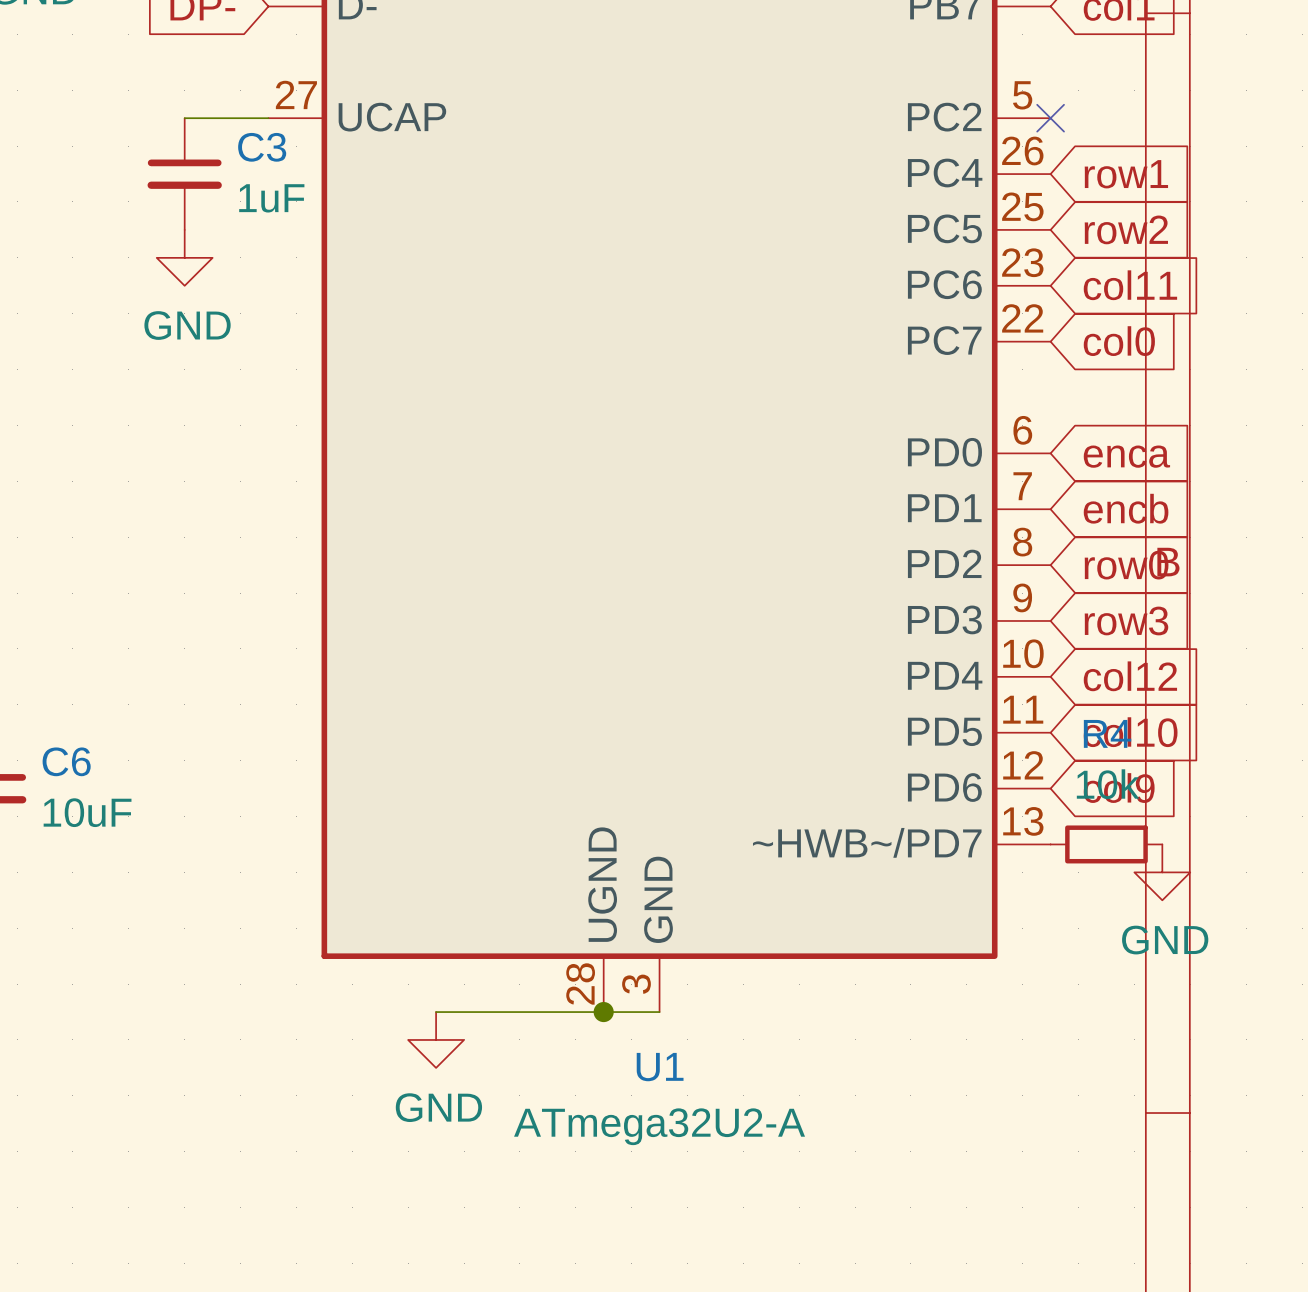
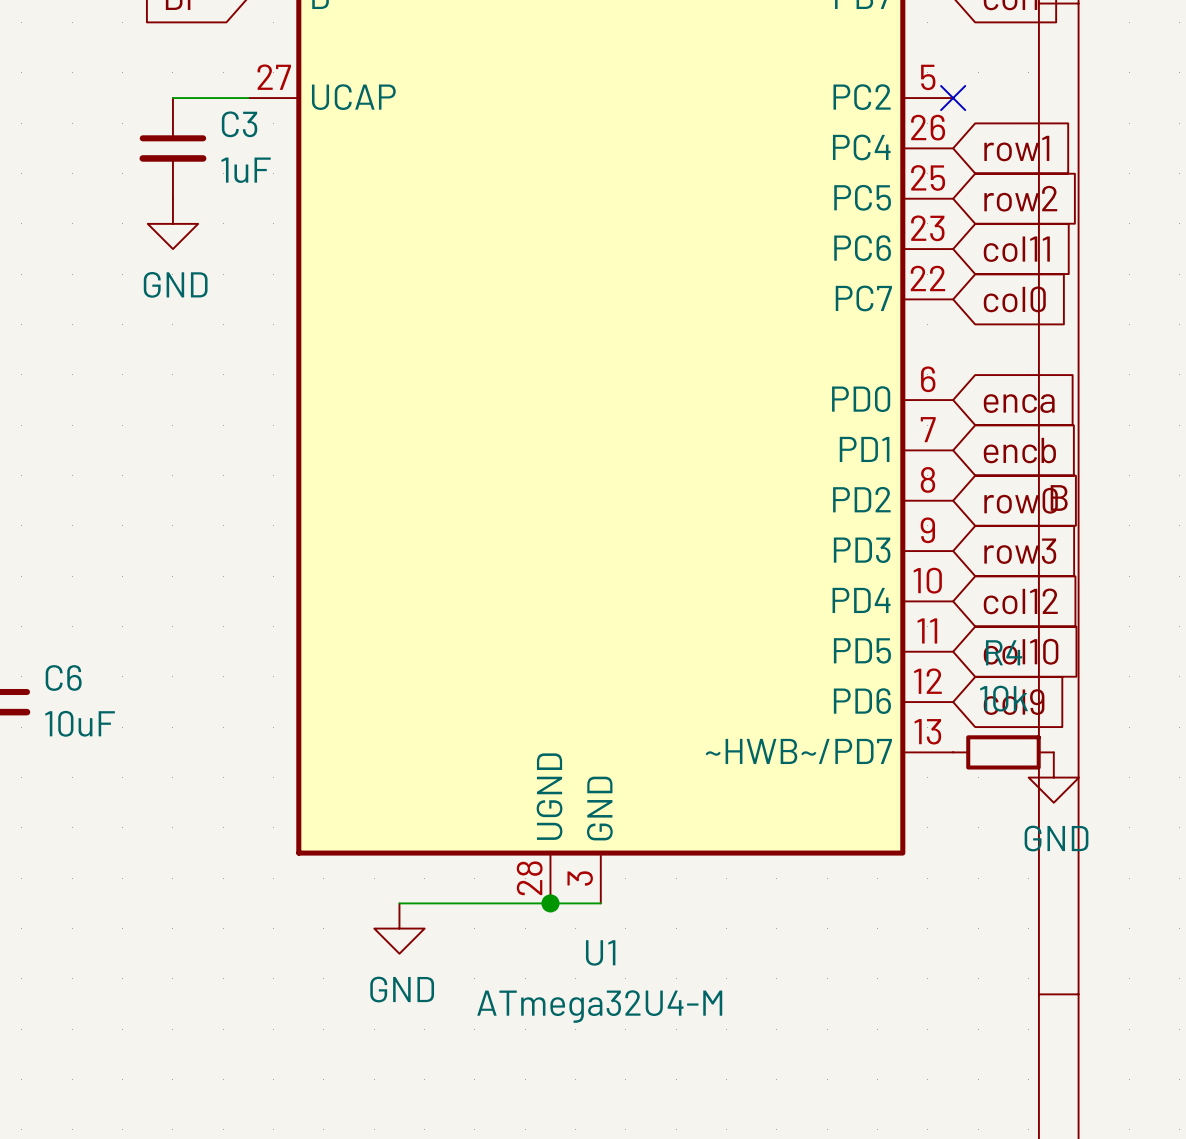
U1 value: ATmega32U2-A (659, 1126) -> ATmega32U4-M (599, 1006)

